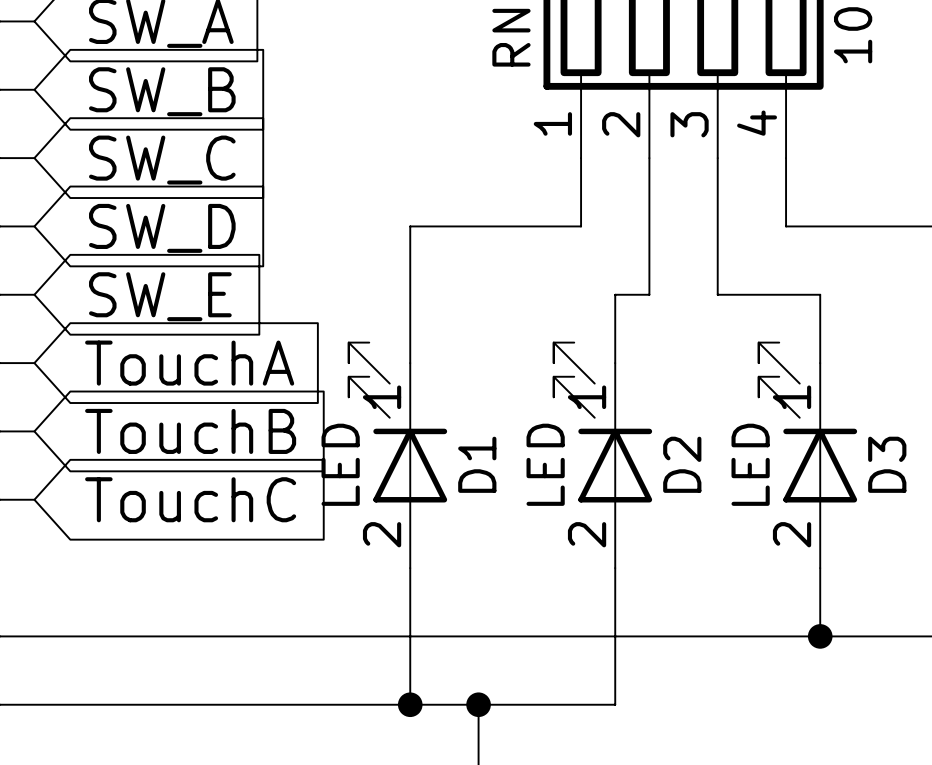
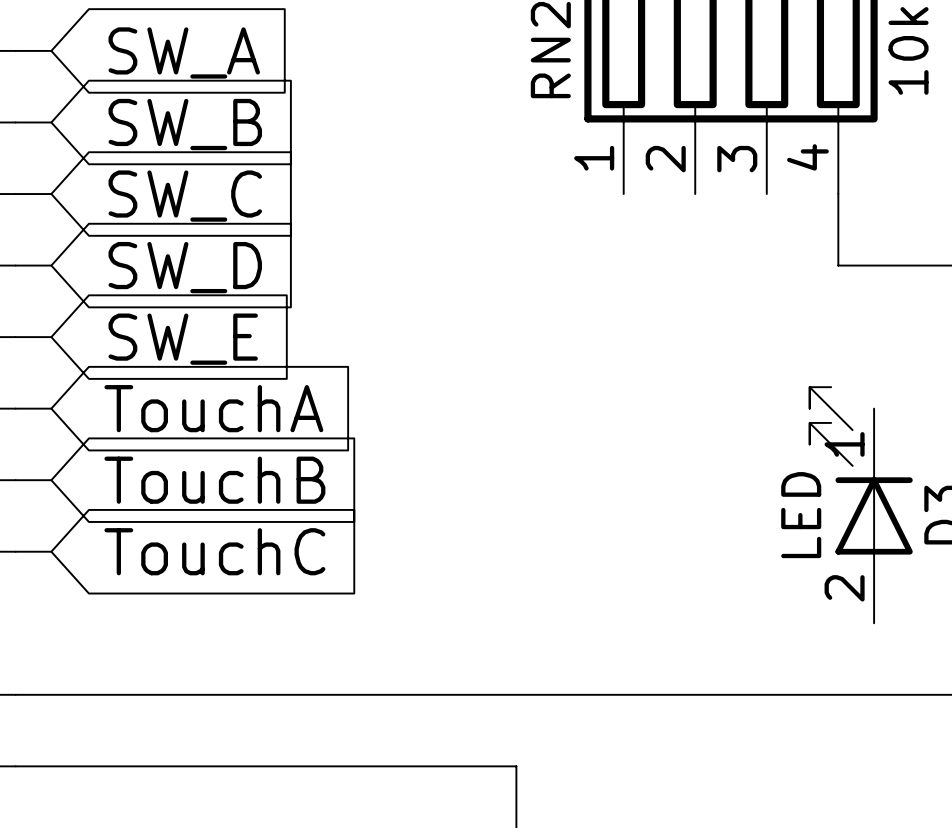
wire: (581, 158) (581, 226) (410, 226) (410, 363) -> none
wire: (649, 158) (649, 294) (615, 294) (615, 363) -> none
wire: (717, 158) (717, 294) (820, 294) (820, 363) -> none
D1: LED (397, 455) -> none
D2: LED (602, 455) -> none
wire: (410, 568) (410, 704) -> none
wire: (615, 568) (615, 704) (478, 704) -> none
wire: (820, 568) (820, 636) -> none
junction: (820, 636) -> none
junction: (410, 704) -> none
junction: (478, 704) -> none

